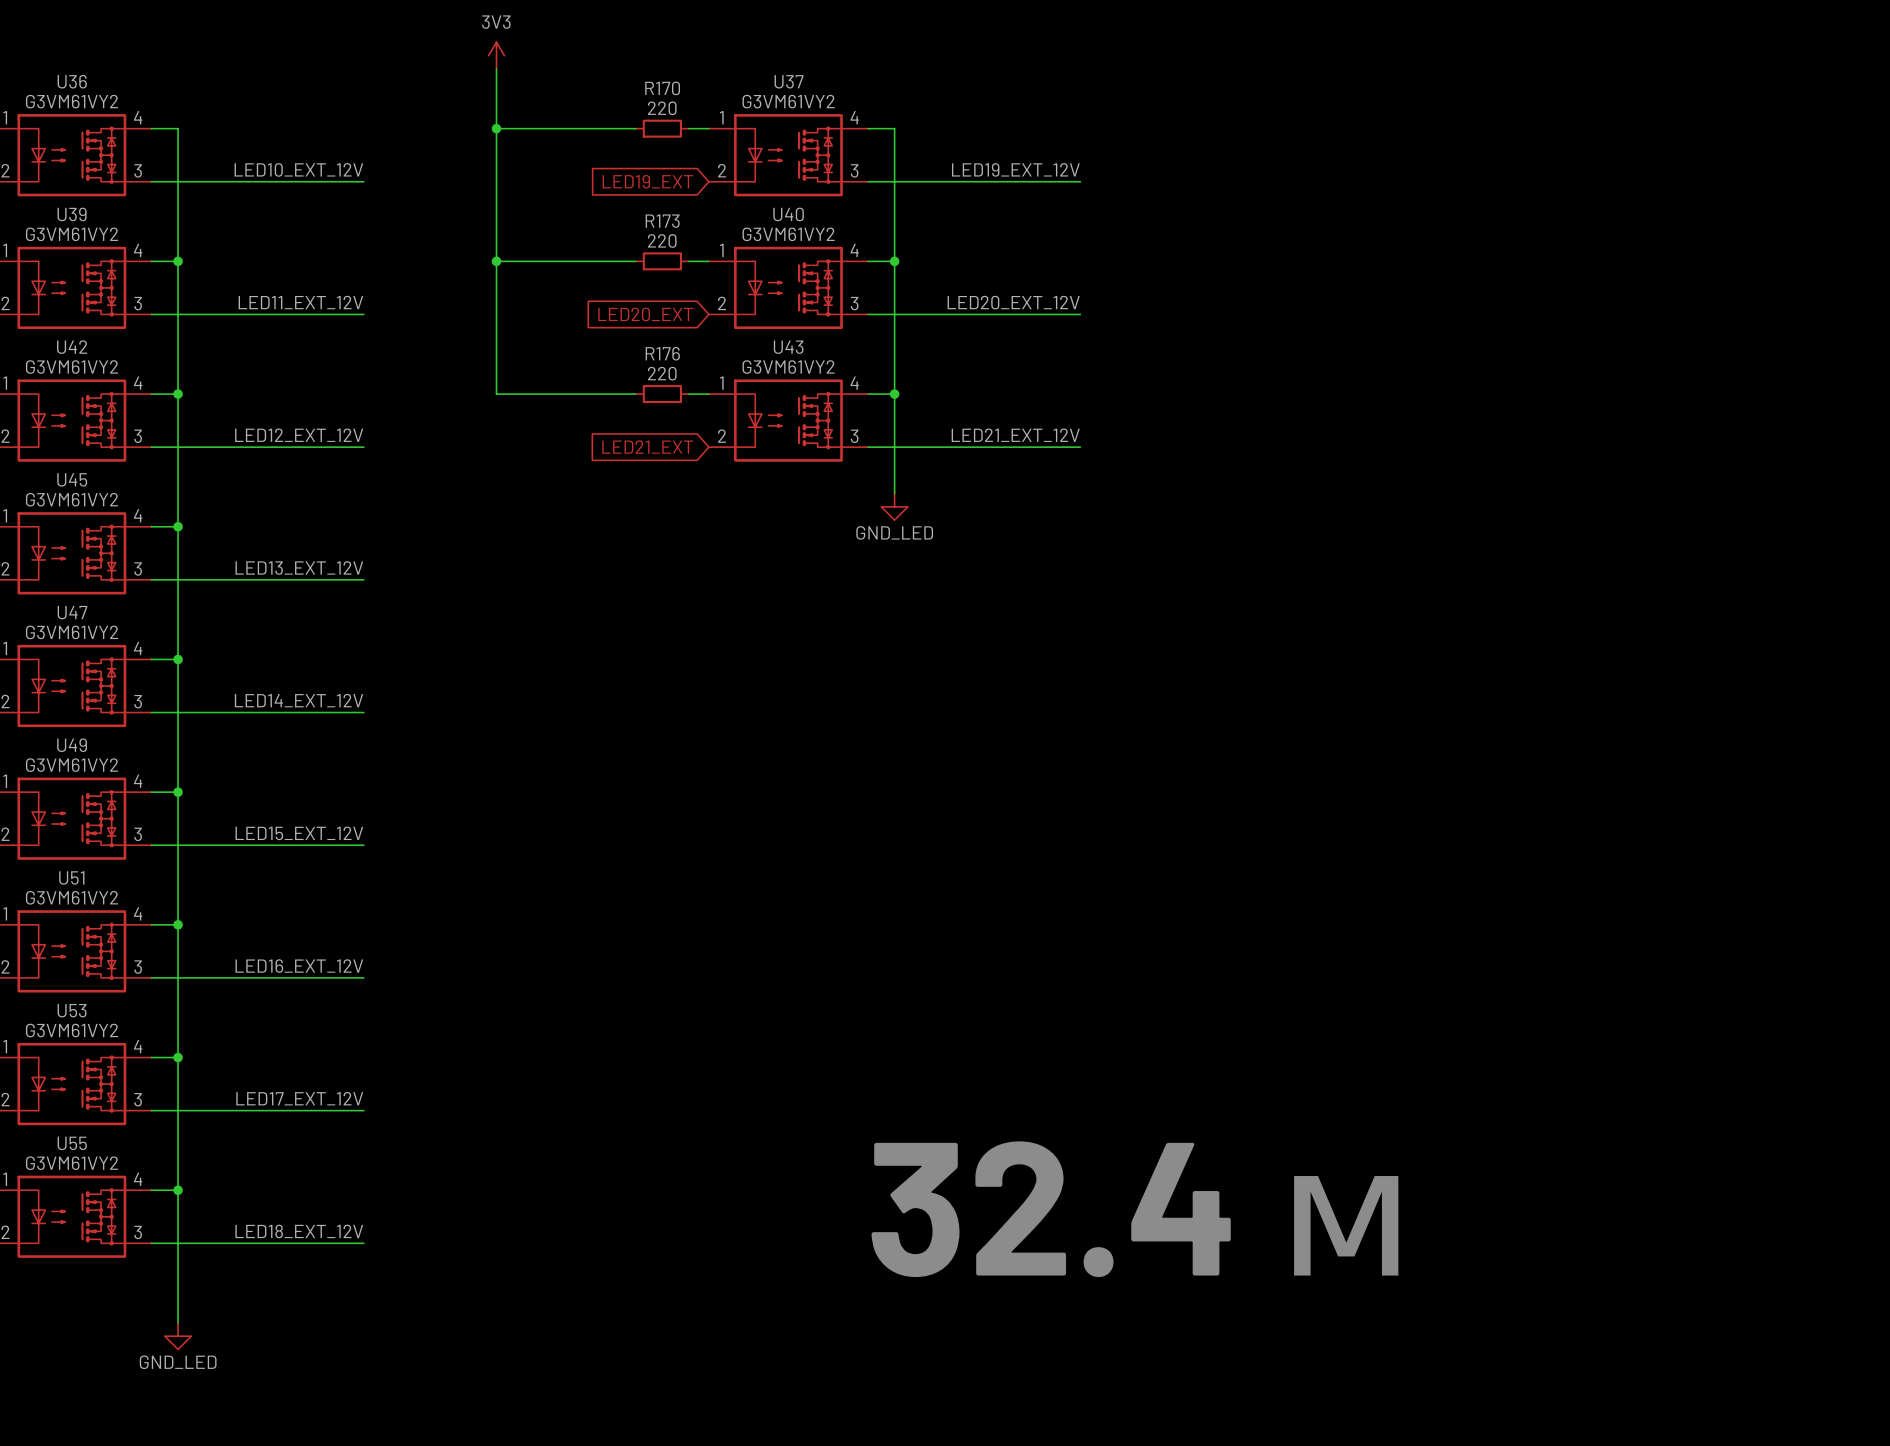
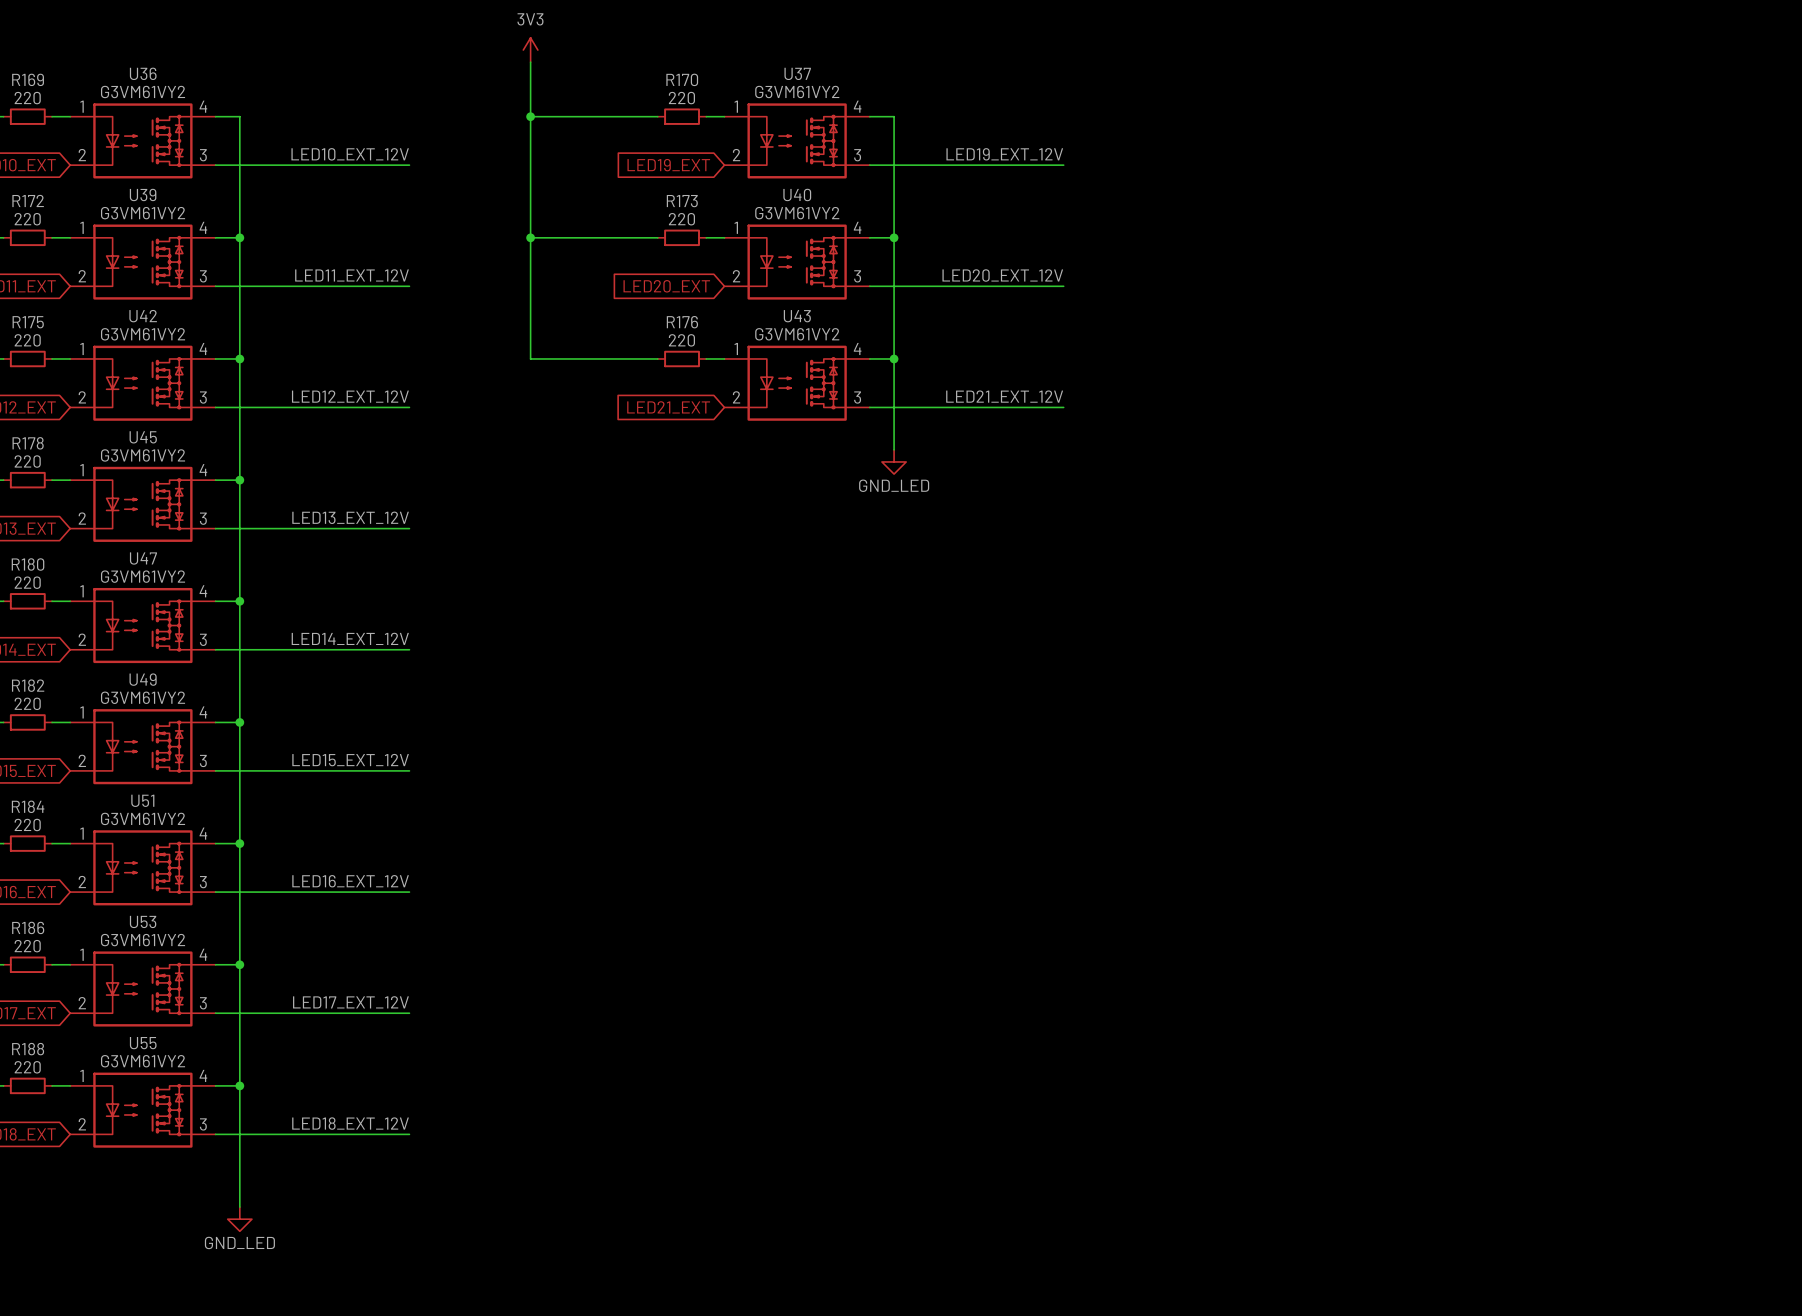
text: 32.4 м (1134, 1209) -> none

